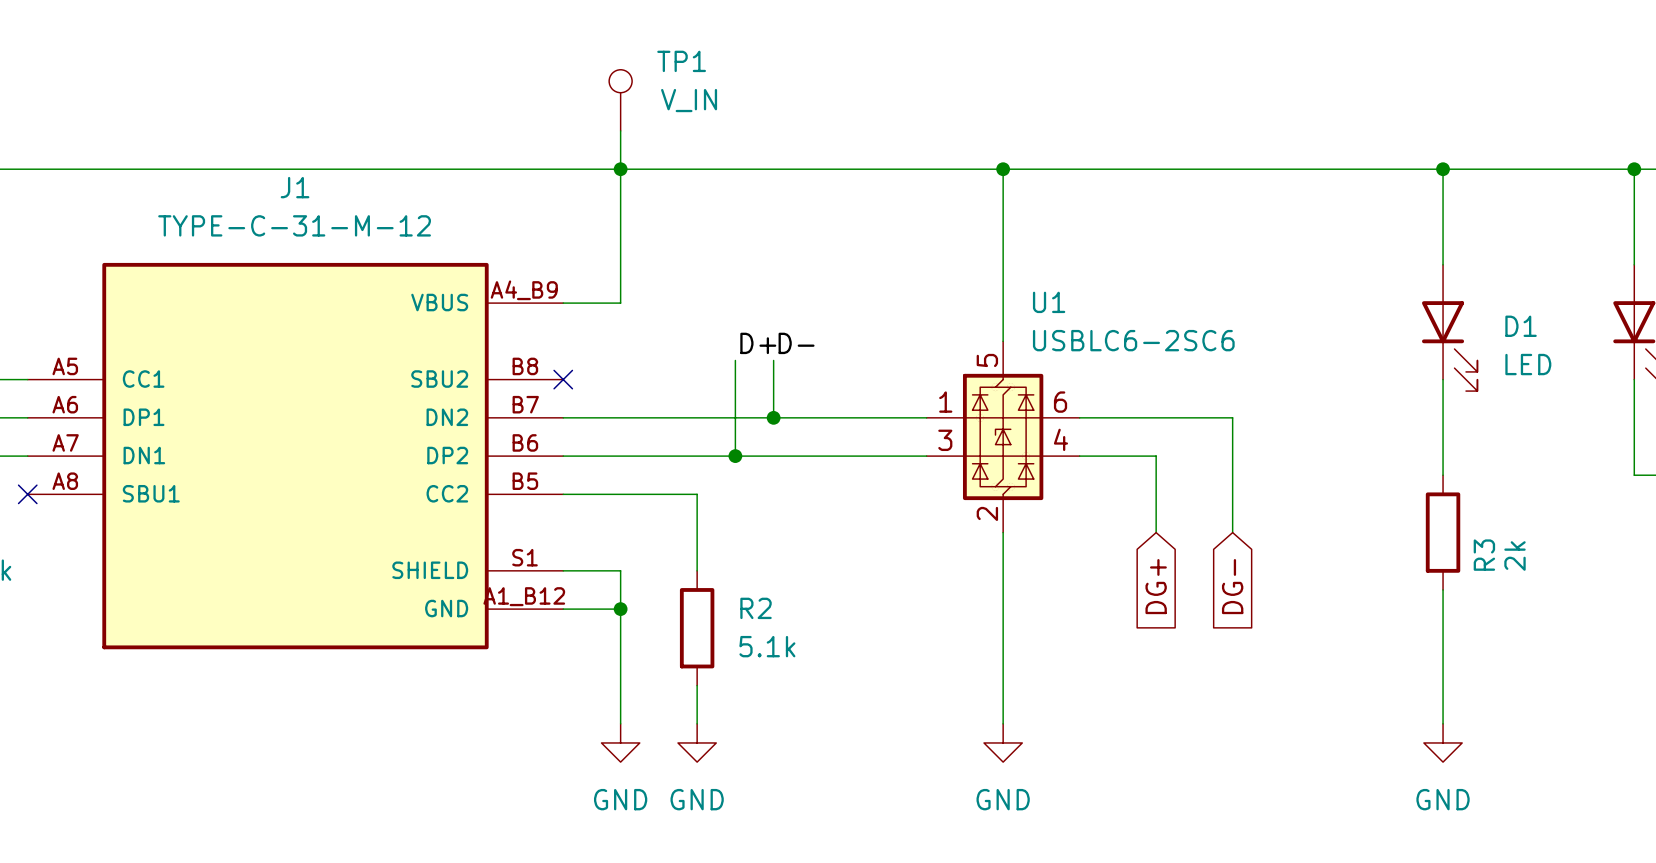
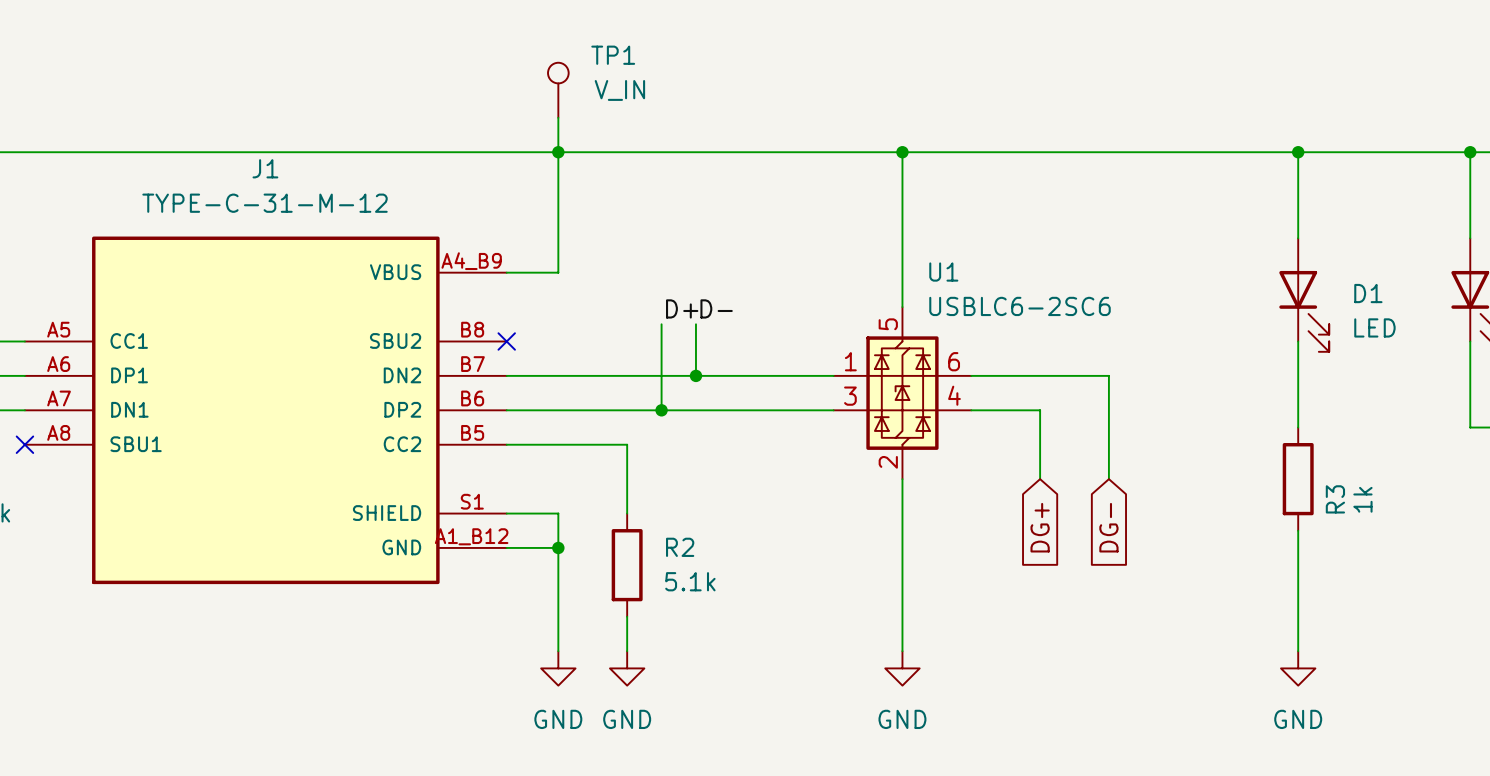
R3 value: 2k (1514, 556) -> 1k (1362, 499)

